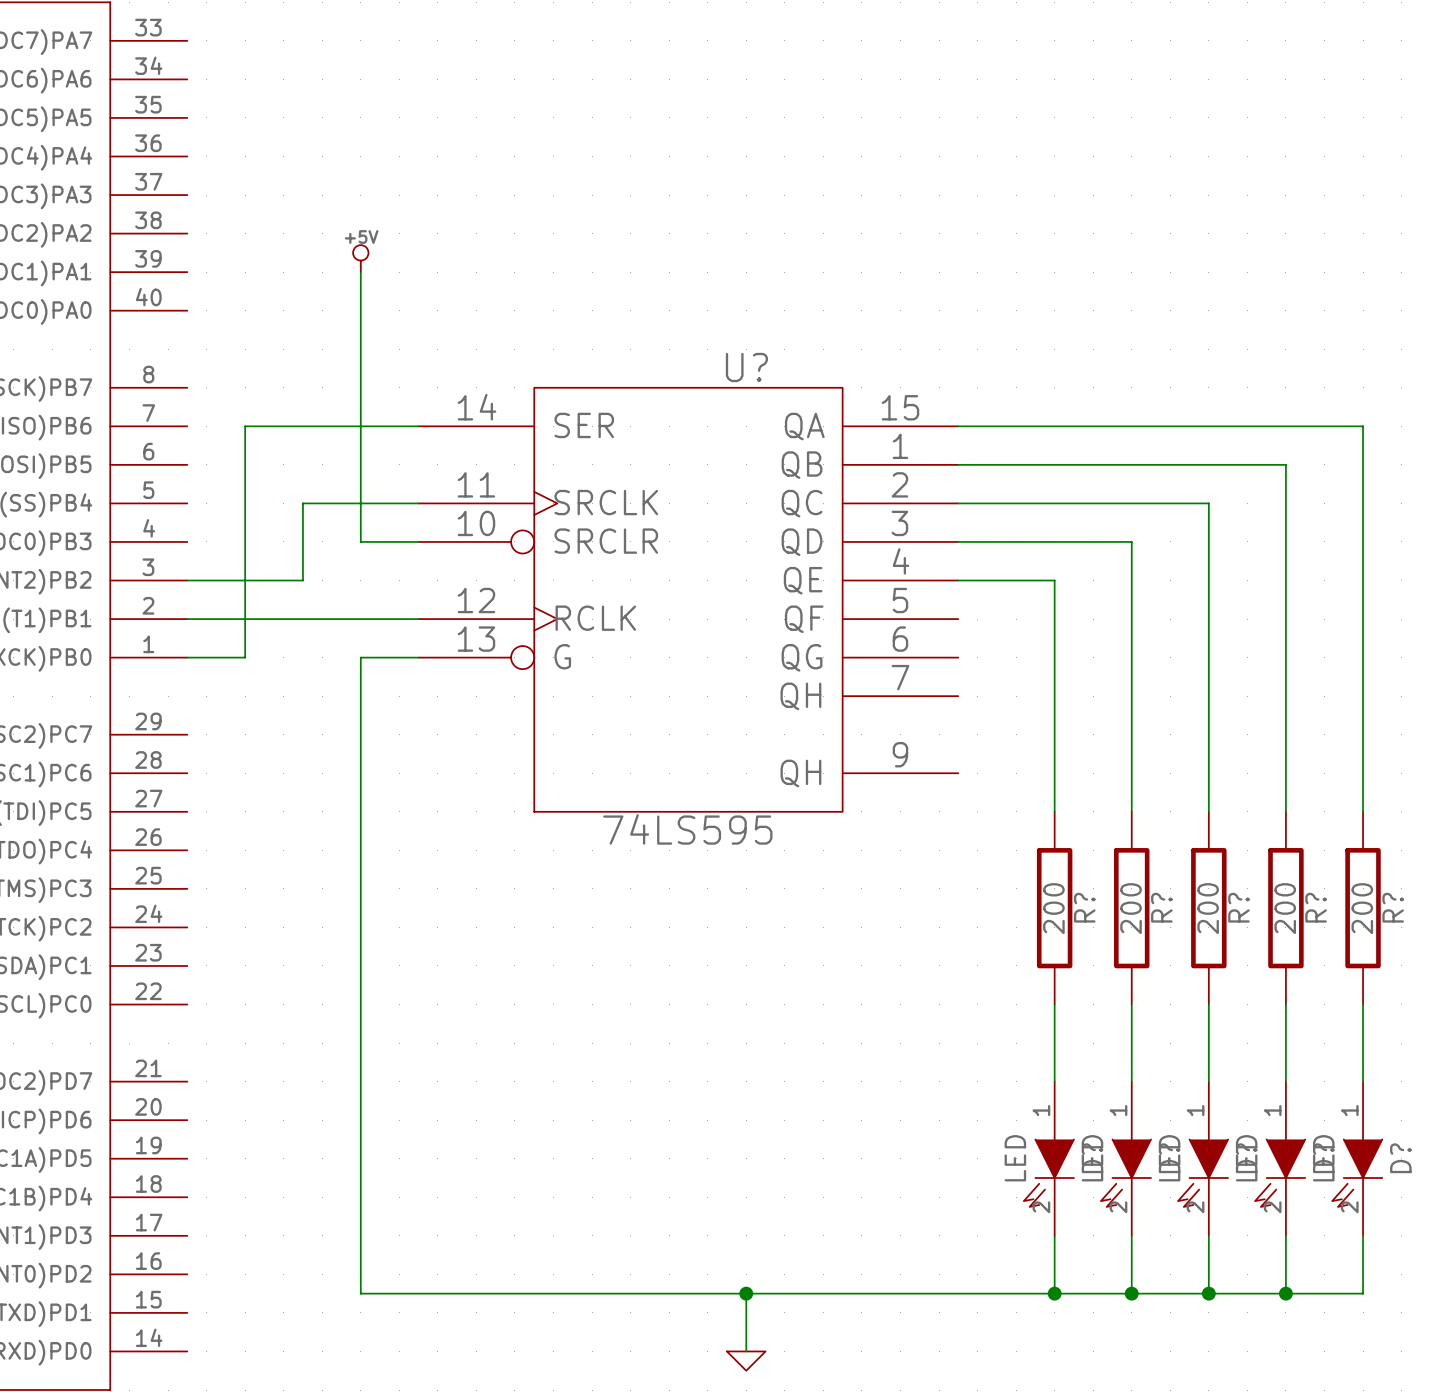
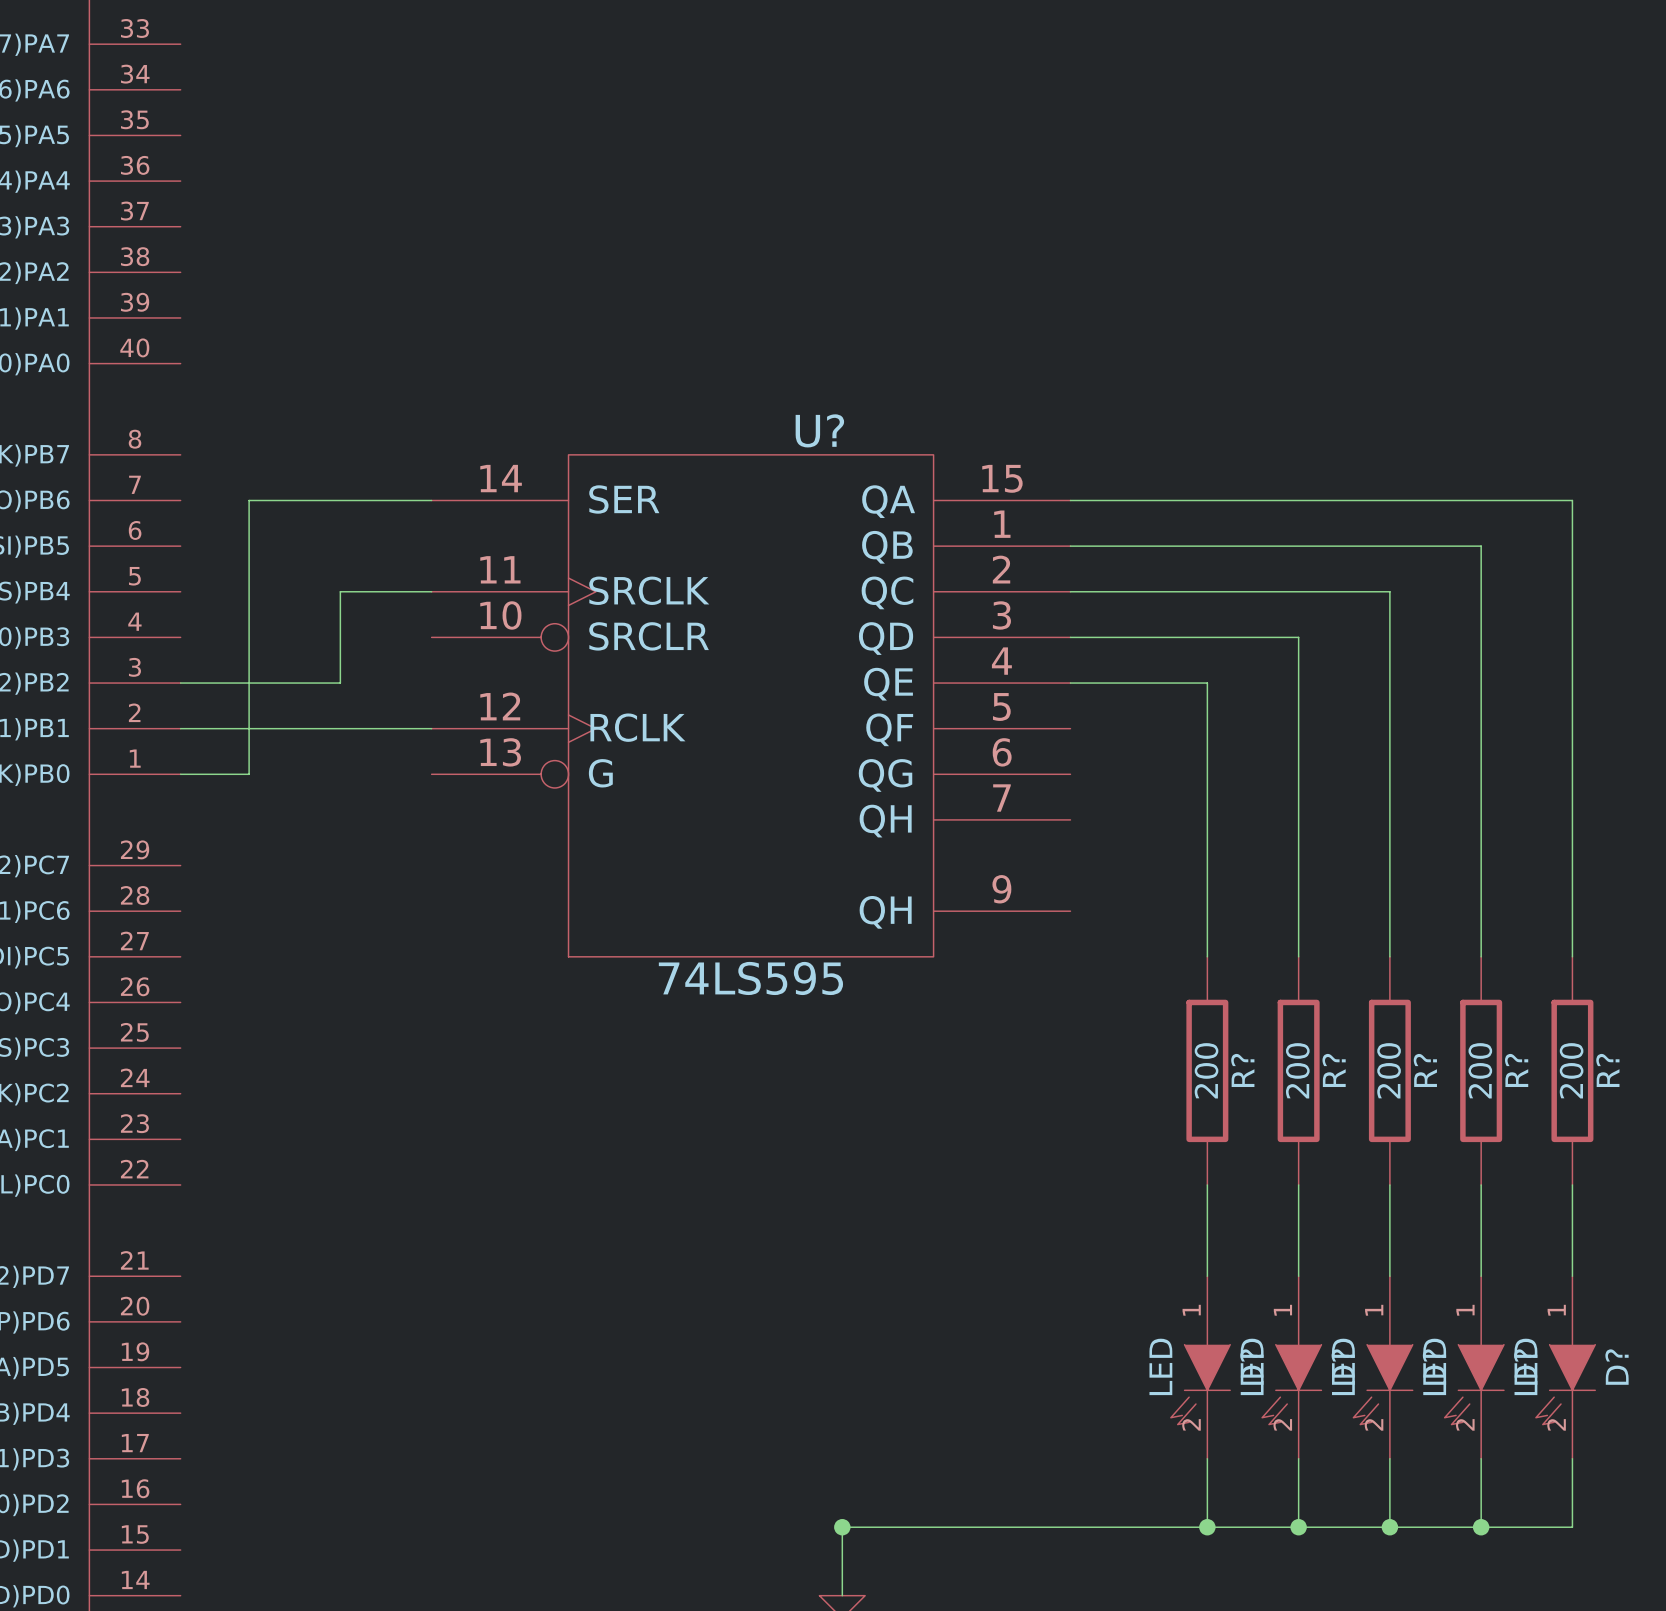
power symbol: +5V (360, 258) -> none
wire: (360, 272) (360, 541) (418, 541) -> none
wire: (322, 503) (302, 503) (302, 580) -> (340, 591) (340, 683) (317, 683)
U? position: (688, 599) -> (751, 705)
wire: (418, 657) (360, 657) (360, 1293) (746, 1293) -> none

